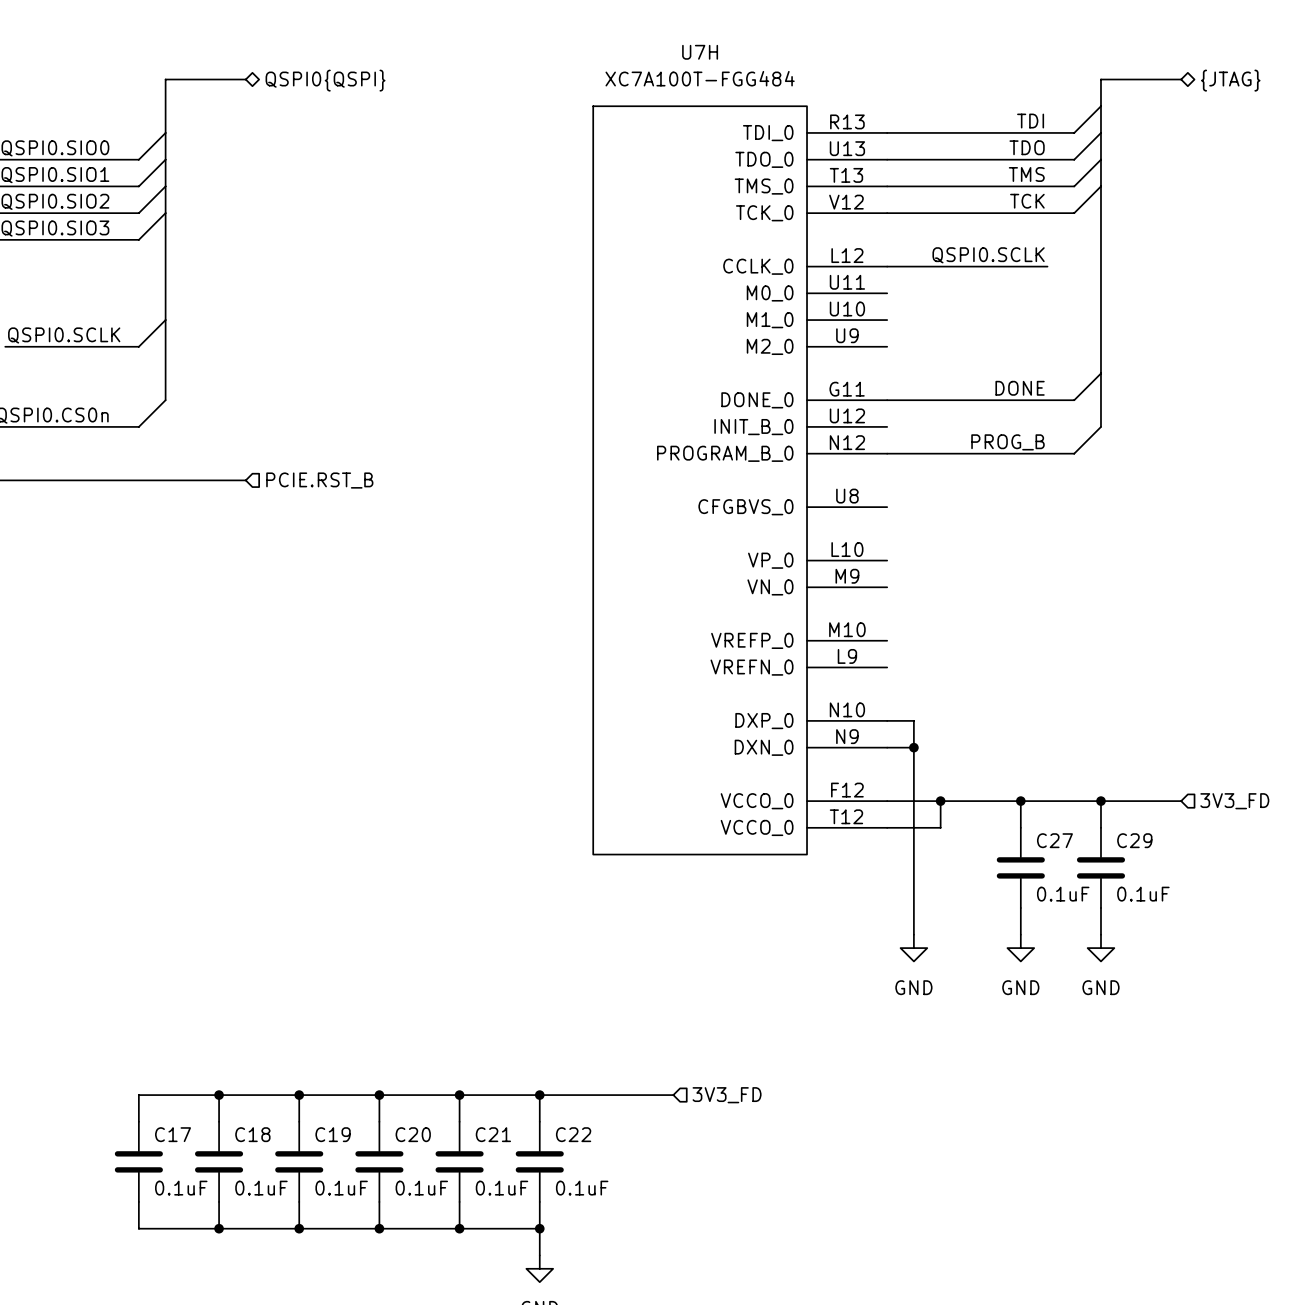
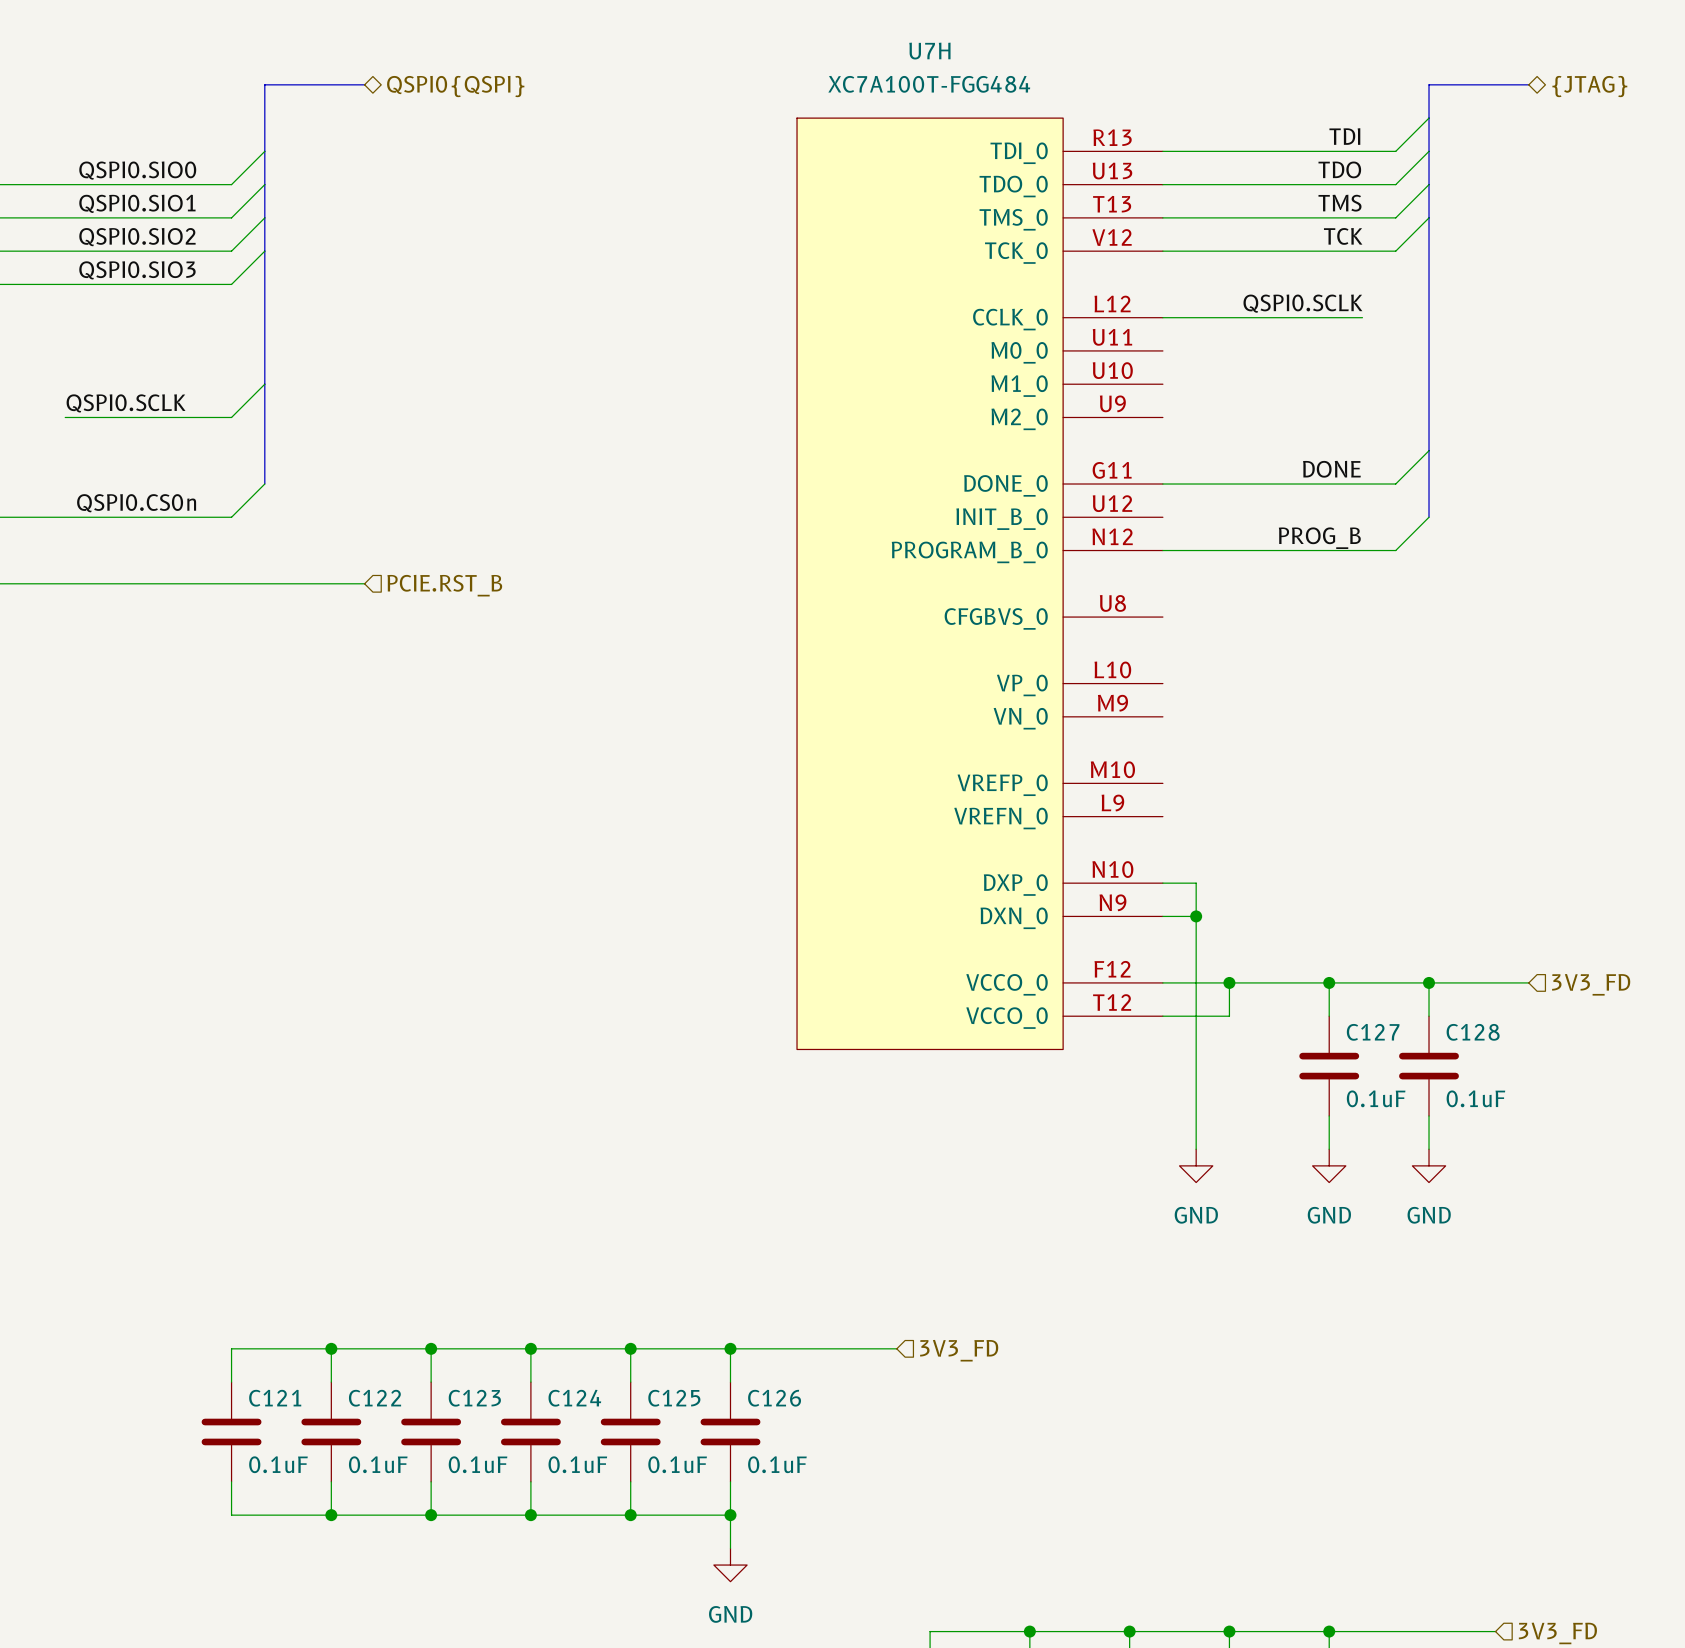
C27 name: C27 (1054, 840) -> C127 (1373, 1032)
C29 name: C29 (1134, 840) -> C128 (1473, 1032)
C17 name: C17 (173, 1134) -> C121 (275, 1398)
C18 name: C18 (252, 1134) -> C122 (375, 1398)
C19 name: C19 (333, 1134) -> C123 (474, 1398)
C20 name: C20 (413, 1134) -> C124 (574, 1398)
C21 name: C21 (493, 1134) -> C125 (674, 1398)
C22 name: C22 (573, 1134) -> C126 (774, 1398)

